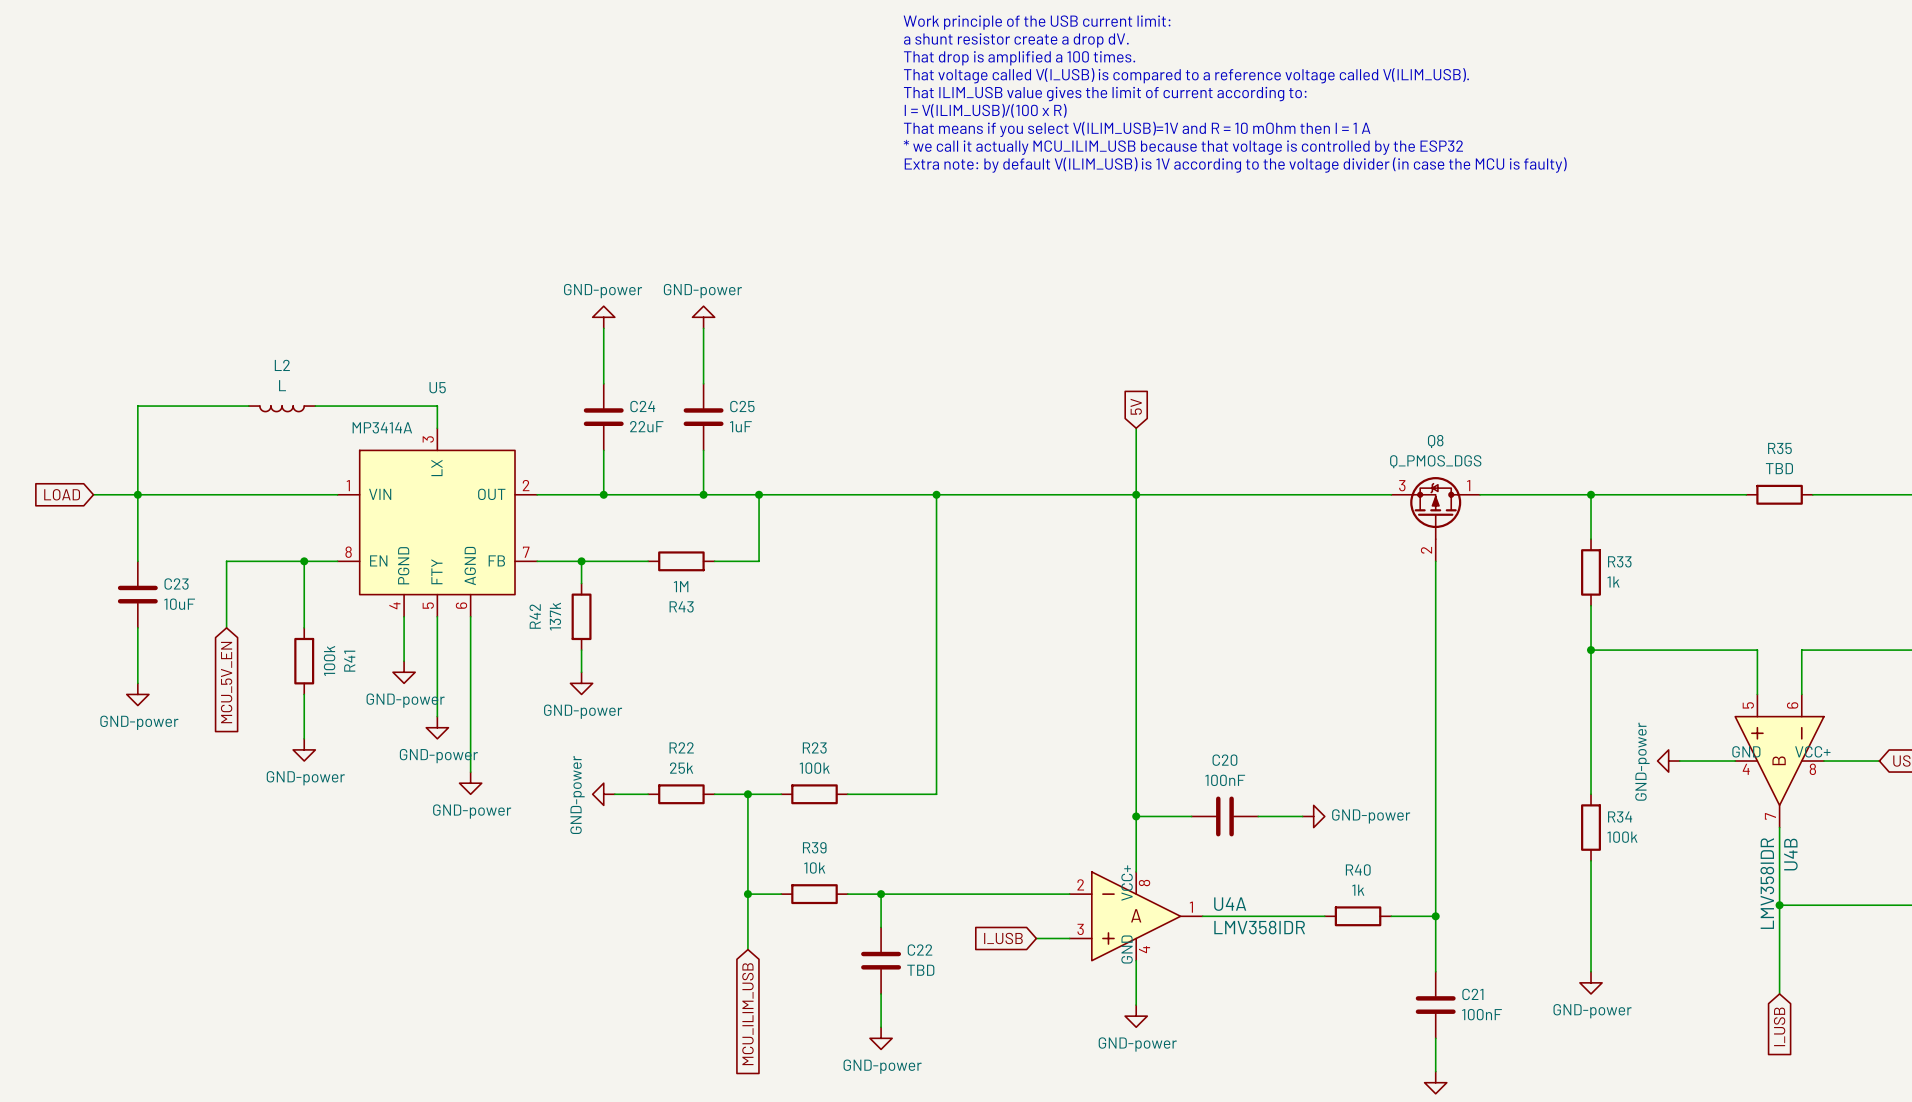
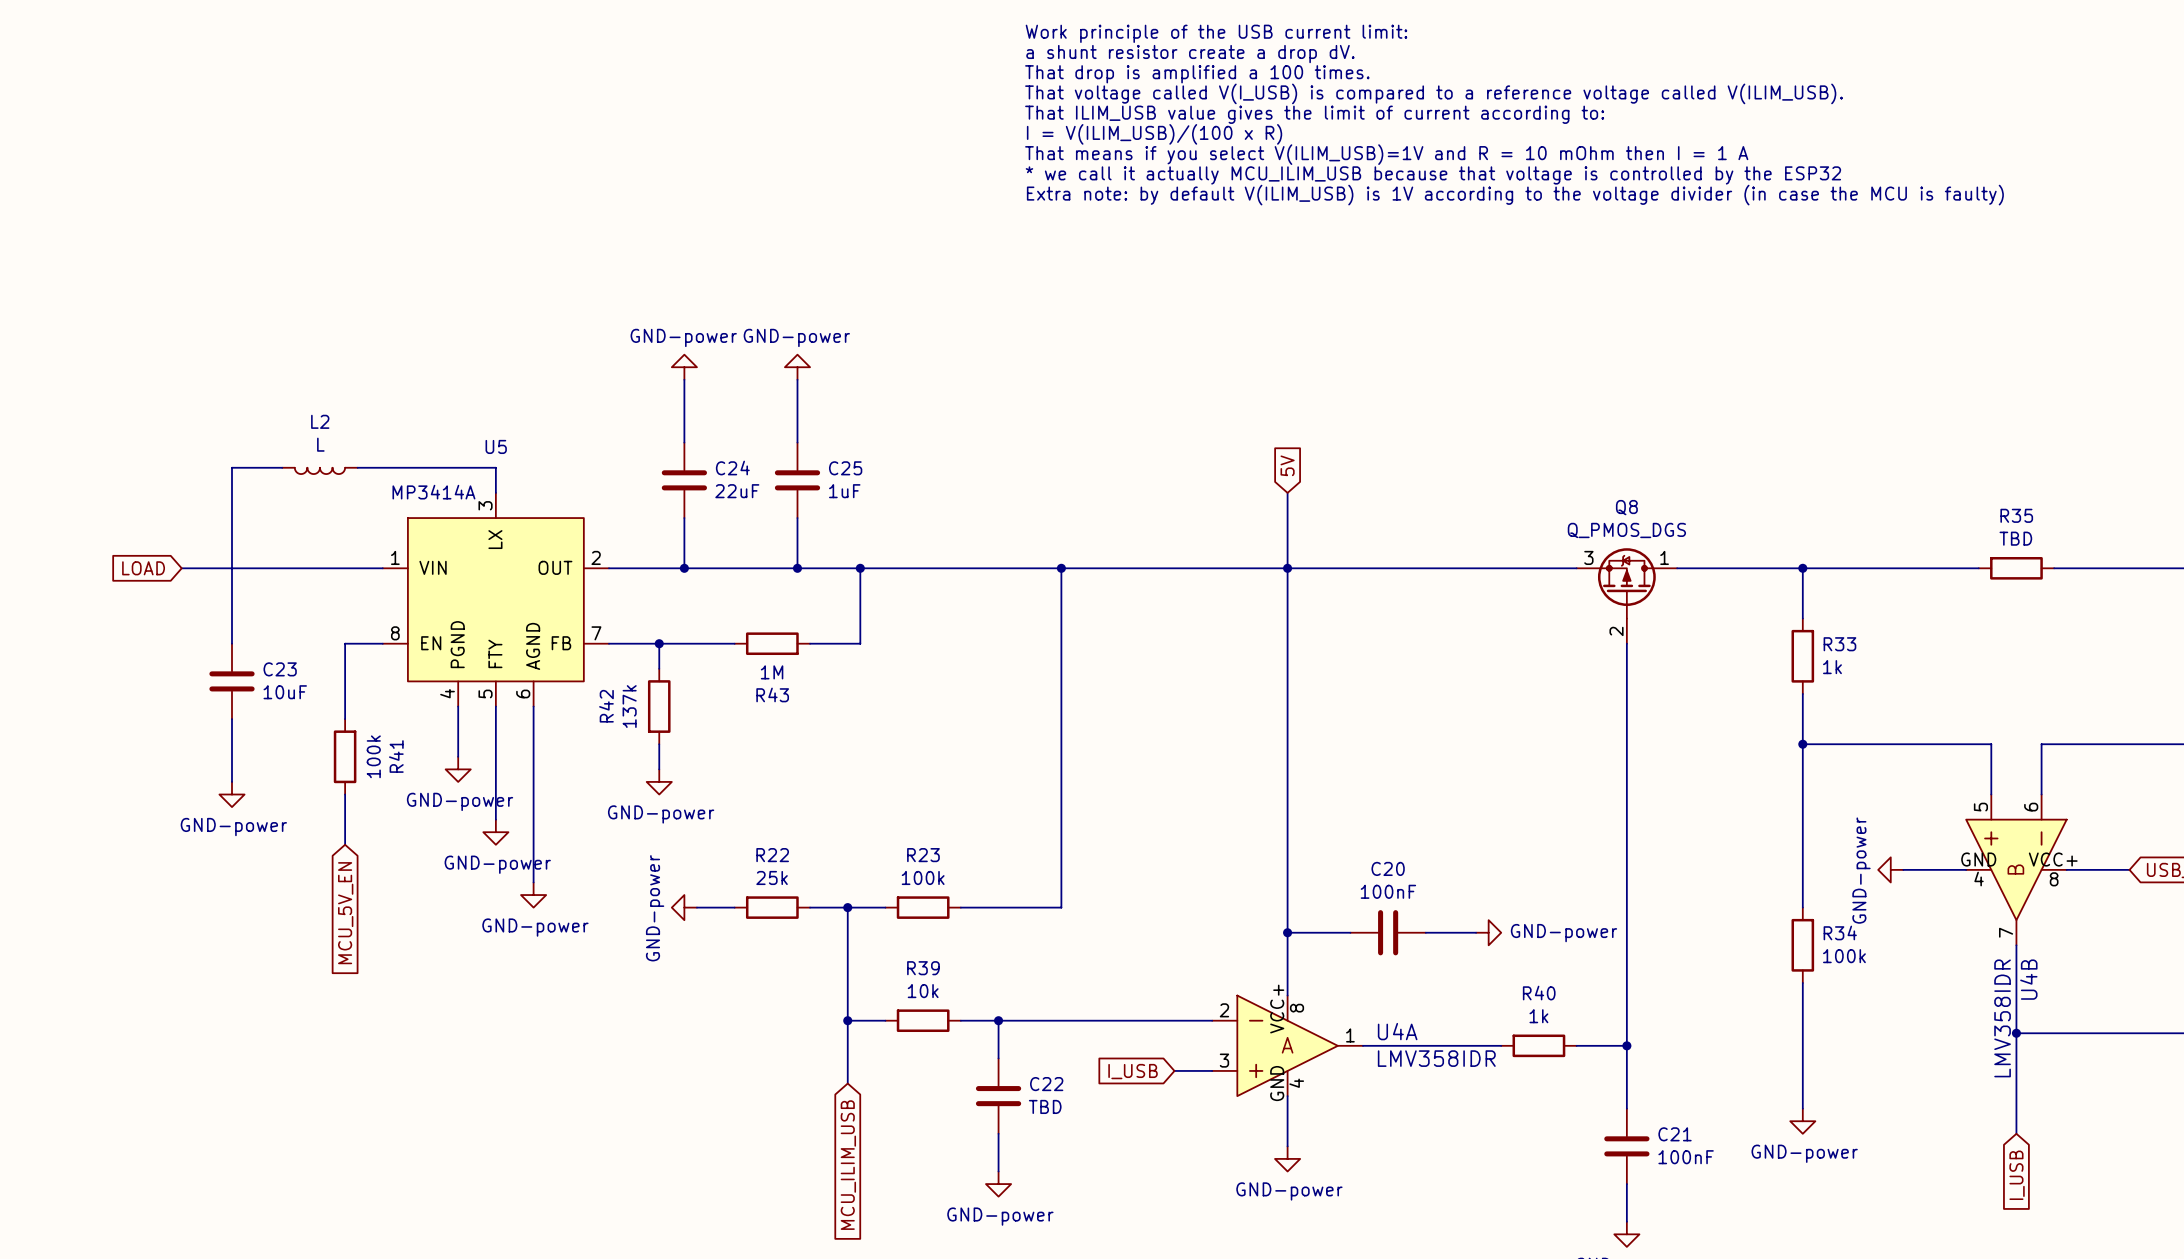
wire: (204, 406) (137, 406) (137, 561) -> (232, 467) (232, 643)
global label position: LOAD (62, 494) -> LOAD (143, 568)
wire: (93, 494) (160, 494) -> none
junction: (137, 494) -> none
wire: (304, 561) (226, 561) (226, 627) -> none
junction: (304, 561) -> none
C23 position: (137, 594) -> (232, 681)
wire: (137, 627) (137, 683) -> (232, 719) (232, 781)
global label position: MCU_5V_EN (226, 682) -> MCU_5V_EN (345, 913)
power symbol: GND-power (137, 694) -> none
power symbol: none -> GND-power (232, 794)
power symbol: GND-power (304, 749) -> none

